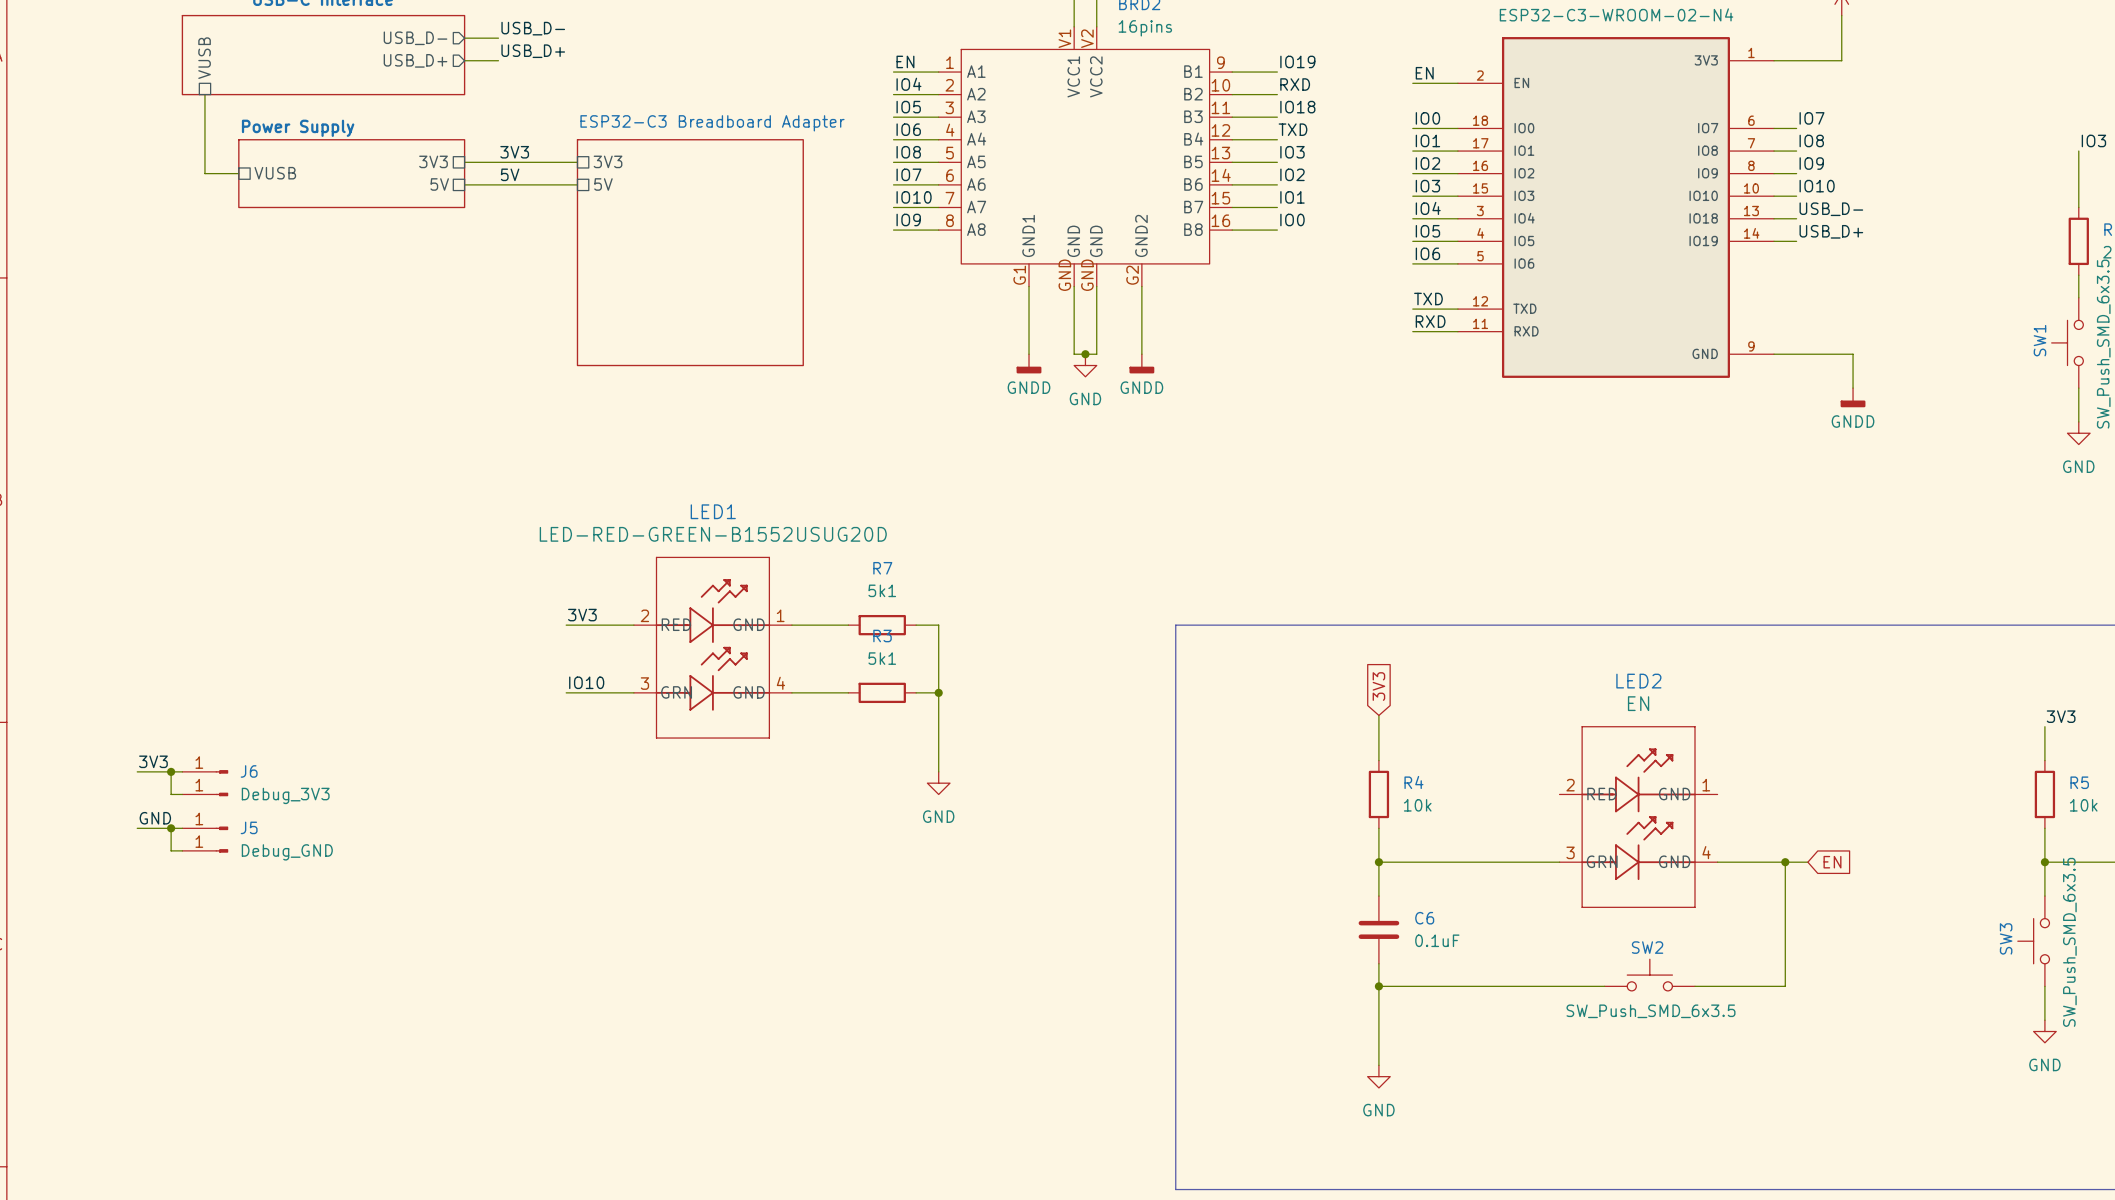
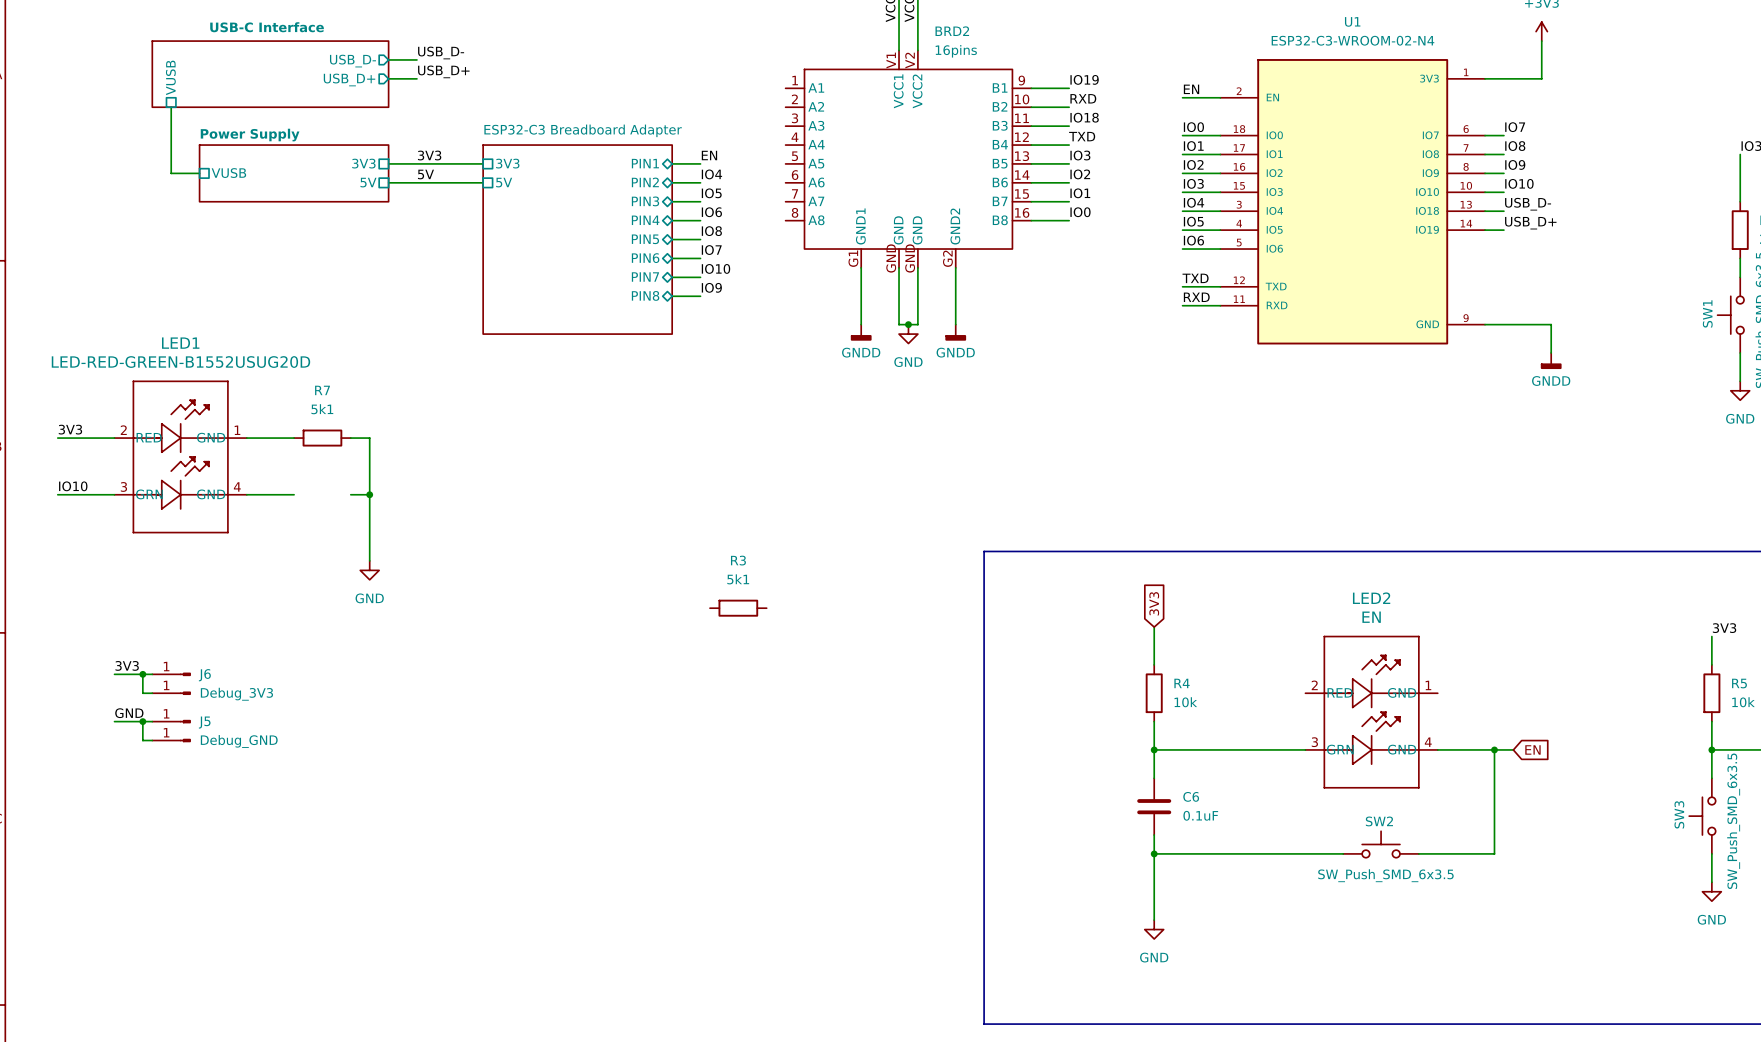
label position: EN (905, 61) -> EN (709, 155)
wire: (893, 72) (938, 72) -> none
label position: IO4 (908, 84) -> IO4 (711, 174)
wire: (893, 94) (938, 94) -> none
label position: IO5 (908, 107) -> IO5 (711, 193)
wire: (893, 117) (938, 117) -> none
label position: IO6 (908, 129) -> IO6 (711, 212)
wire: (893, 139) (938, 139) -> none
label position: IO8 (908, 152) -> IO8 (711, 231)
sheet pin: none -> PIN1 (645, 163)
wire: none -> (672, 163) (700, 163)
wire: (893, 162) (938, 162) -> none
label position: IO7 (908, 174) -> IO7 (711, 250)
sheet pin: none -> PIN2 (645, 182)
wire: none -> (672, 182) (700, 182)
wire: (893, 184) (938, 184) -> none
label position: IO10 (914, 197) -> IO10 (715, 268)
sheet pin: none -> PIN3 (645, 201)
wire: none -> (672, 201) (700, 201)
wire: (893, 207) (938, 207) -> none
label position: IO9 (908, 219) -> IO9 (711, 287)
sheet pin: none -> PIN4 (645, 220)
wire: none -> (672, 220) (700, 220)
wire: (893, 230) (938, 230) -> none
sheet pin: none -> PIN5 (645, 239)
wire: none -> (672, 239) (700, 239)
sheet pin: none -> PIN6 (645, 258)
wire: none -> (672, 258) (700, 258)
sheet pin: none -> PIN7 (645, 277)
wire: none -> (672, 277) (700, 277)
sheet pin: none -> PIN8 (645, 295)
wire: none -> (672, 296) (700, 296)
label: none -> 3V3 (70, 429)
wire: none -> (57, 438) (114, 438)
wire: none -> (246, 438) (294, 438)
wire: none -> (350, 438) (369, 438) (369, 560)
label: none -> IO10 (73, 486)
wire: none -> (57, 494) (114, 494)
wire: none -> (246, 494) (294, 494)
wire: none -> (350, 494) (369, 494)
junction: none -> (369, 494)
label: 3V3 (582, 615) -> none
wire: (566, 625) (633, 625) -> none
wire: (791, 625) (848, 625) -> none
R7 position: (882, 625) -> (322, 438)
wire: (916, 625) (938, 625) (938, 771) -> none
power symbol: none -> GND (369, 570)
LED1 position: (712, 647) -> (180, 456)
label: IO10 (586, 682) -> none
wire: (566, 692) (633, 692) -> none
wire: (791, 692) (848, 692) -> none
wire: (916, 692) (938, 692) -> none
junction: (938, 692) -> none
power symbol: GND (938, 783) -> none

